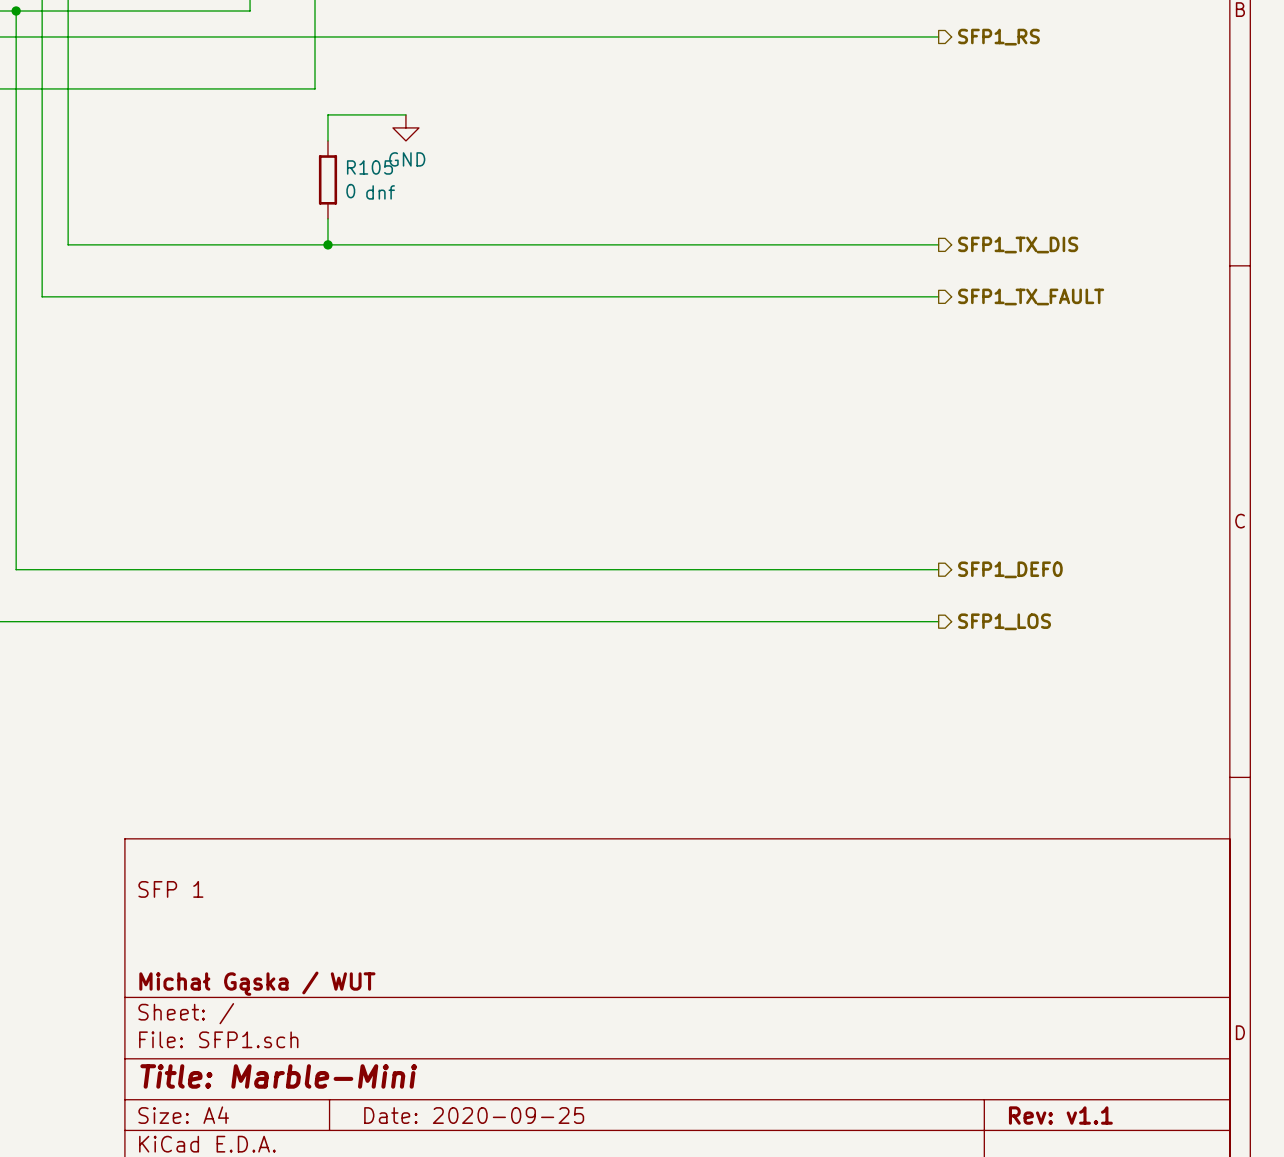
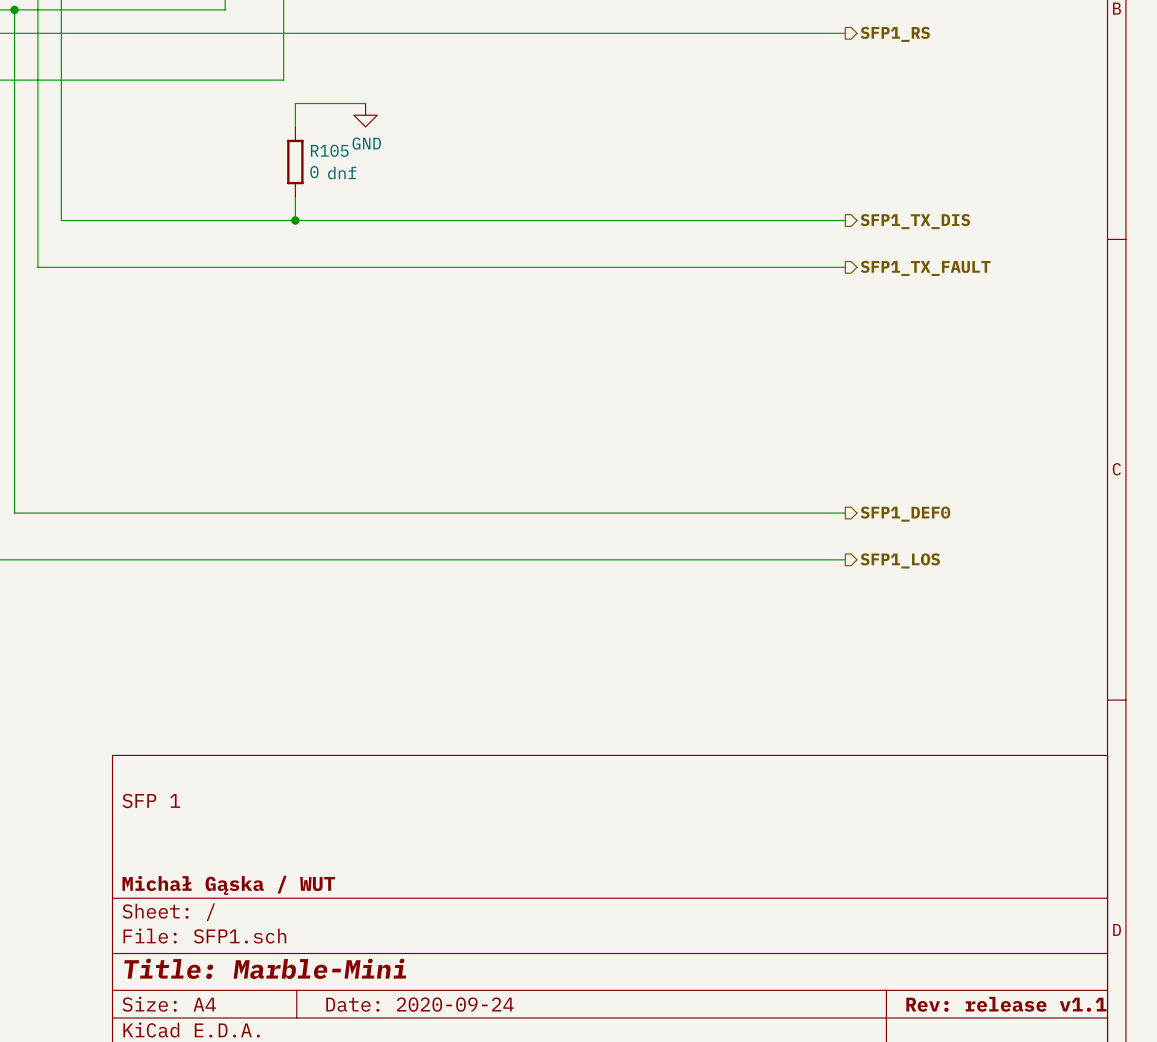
title block: Date: 2020-09-25 (474, 1115) -> Date: 2020-09-24 (420, 1004)
title block: Rev: v1.1 (1060, 1115) -> Rev: release v1.1 (1006, 1004)

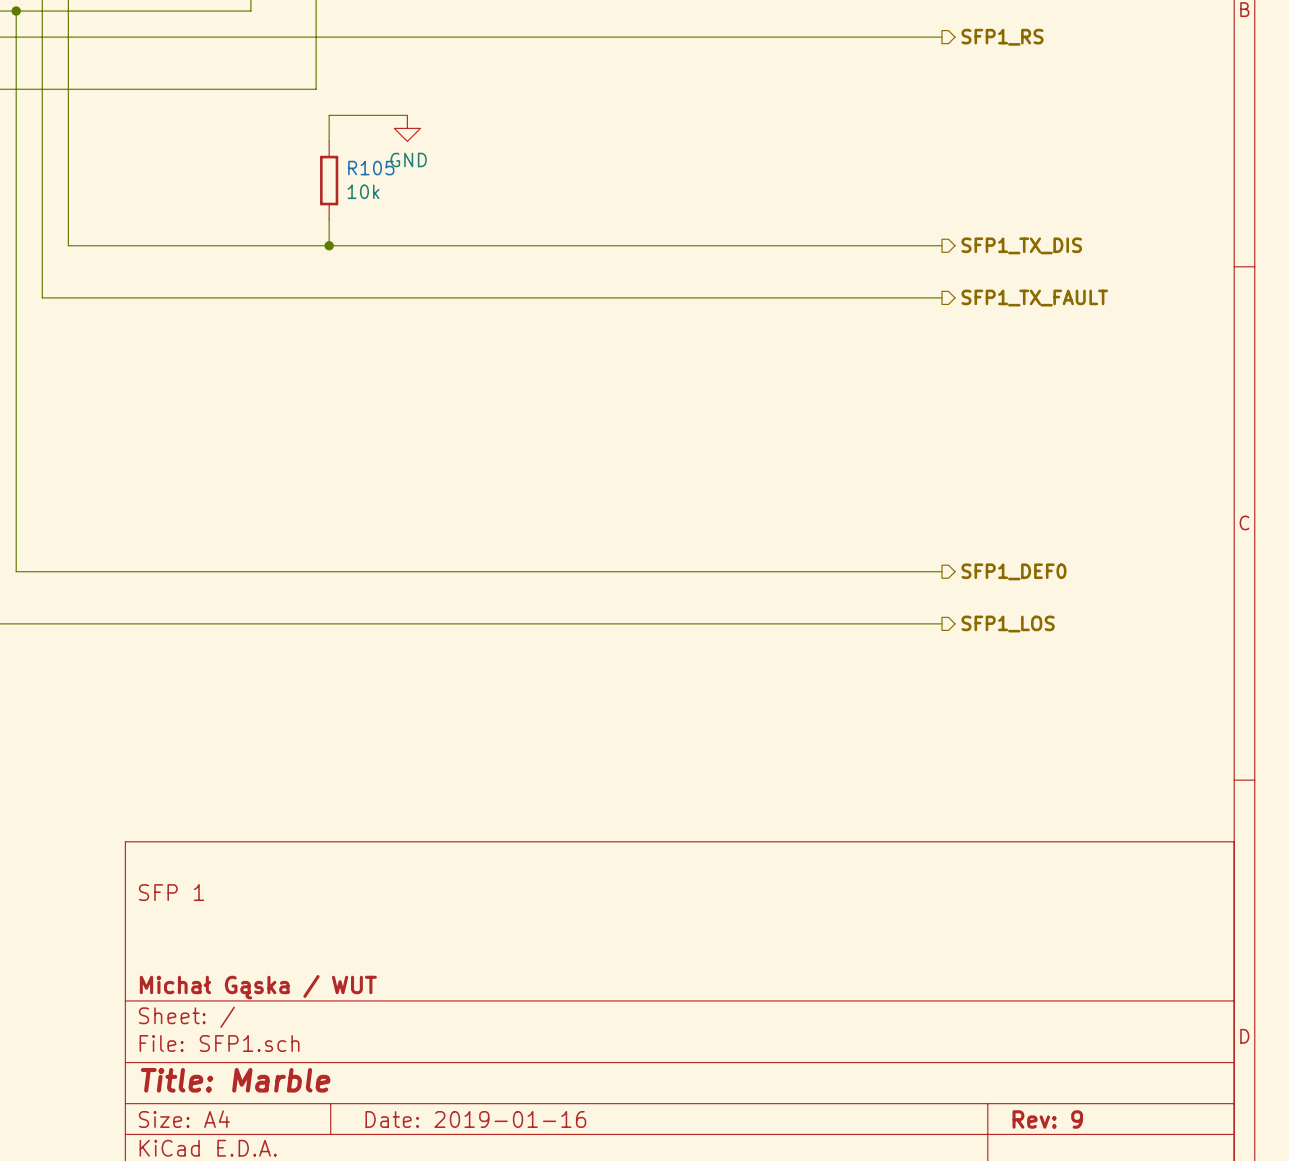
R105 text: none -> 10k (363, 191)
R105 text: 0 (314, 172) -> none
R105 text: dnf (342, 173) -> none
title block: Title: Marble-Mini (265, 968) -> Title: Marble (235, 1080)
title block: Date: 2020-09-24 (420, 1004) -> Date: 2019-01-16 (475, 1119)
title block: Rev: release v1.1 (1006, 1004) -> Rev: 9 (1047, 1119)

